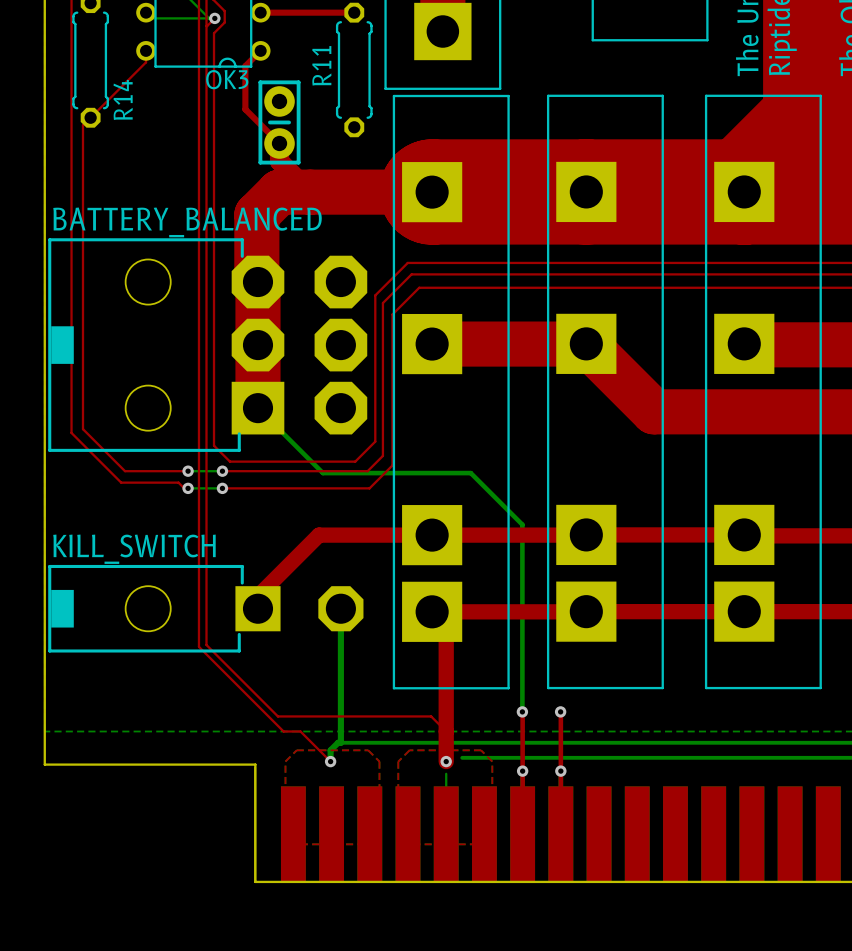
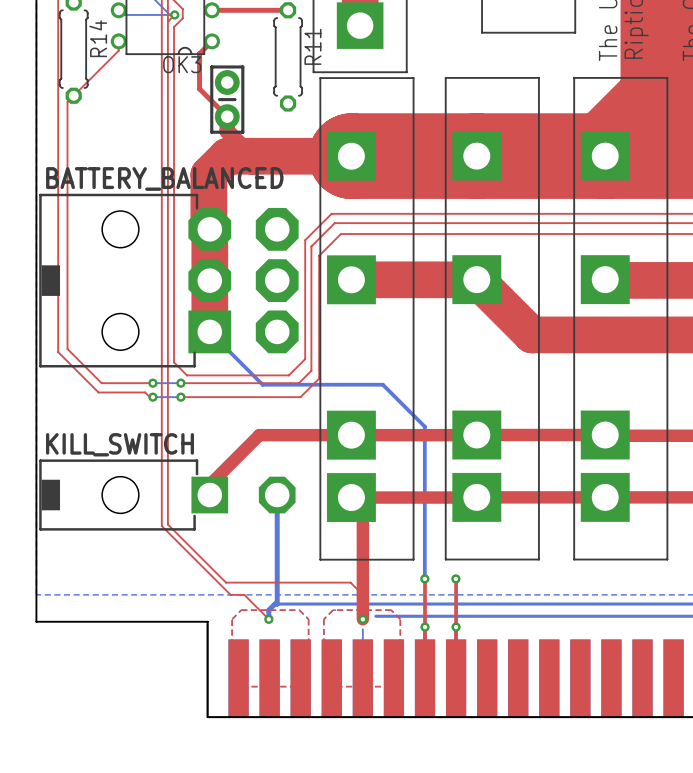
R11 name position: R11 (321, 65) -> R11 (312, 46)
R14 name position: R14 (123, 99) -> R14 (98, 38)

